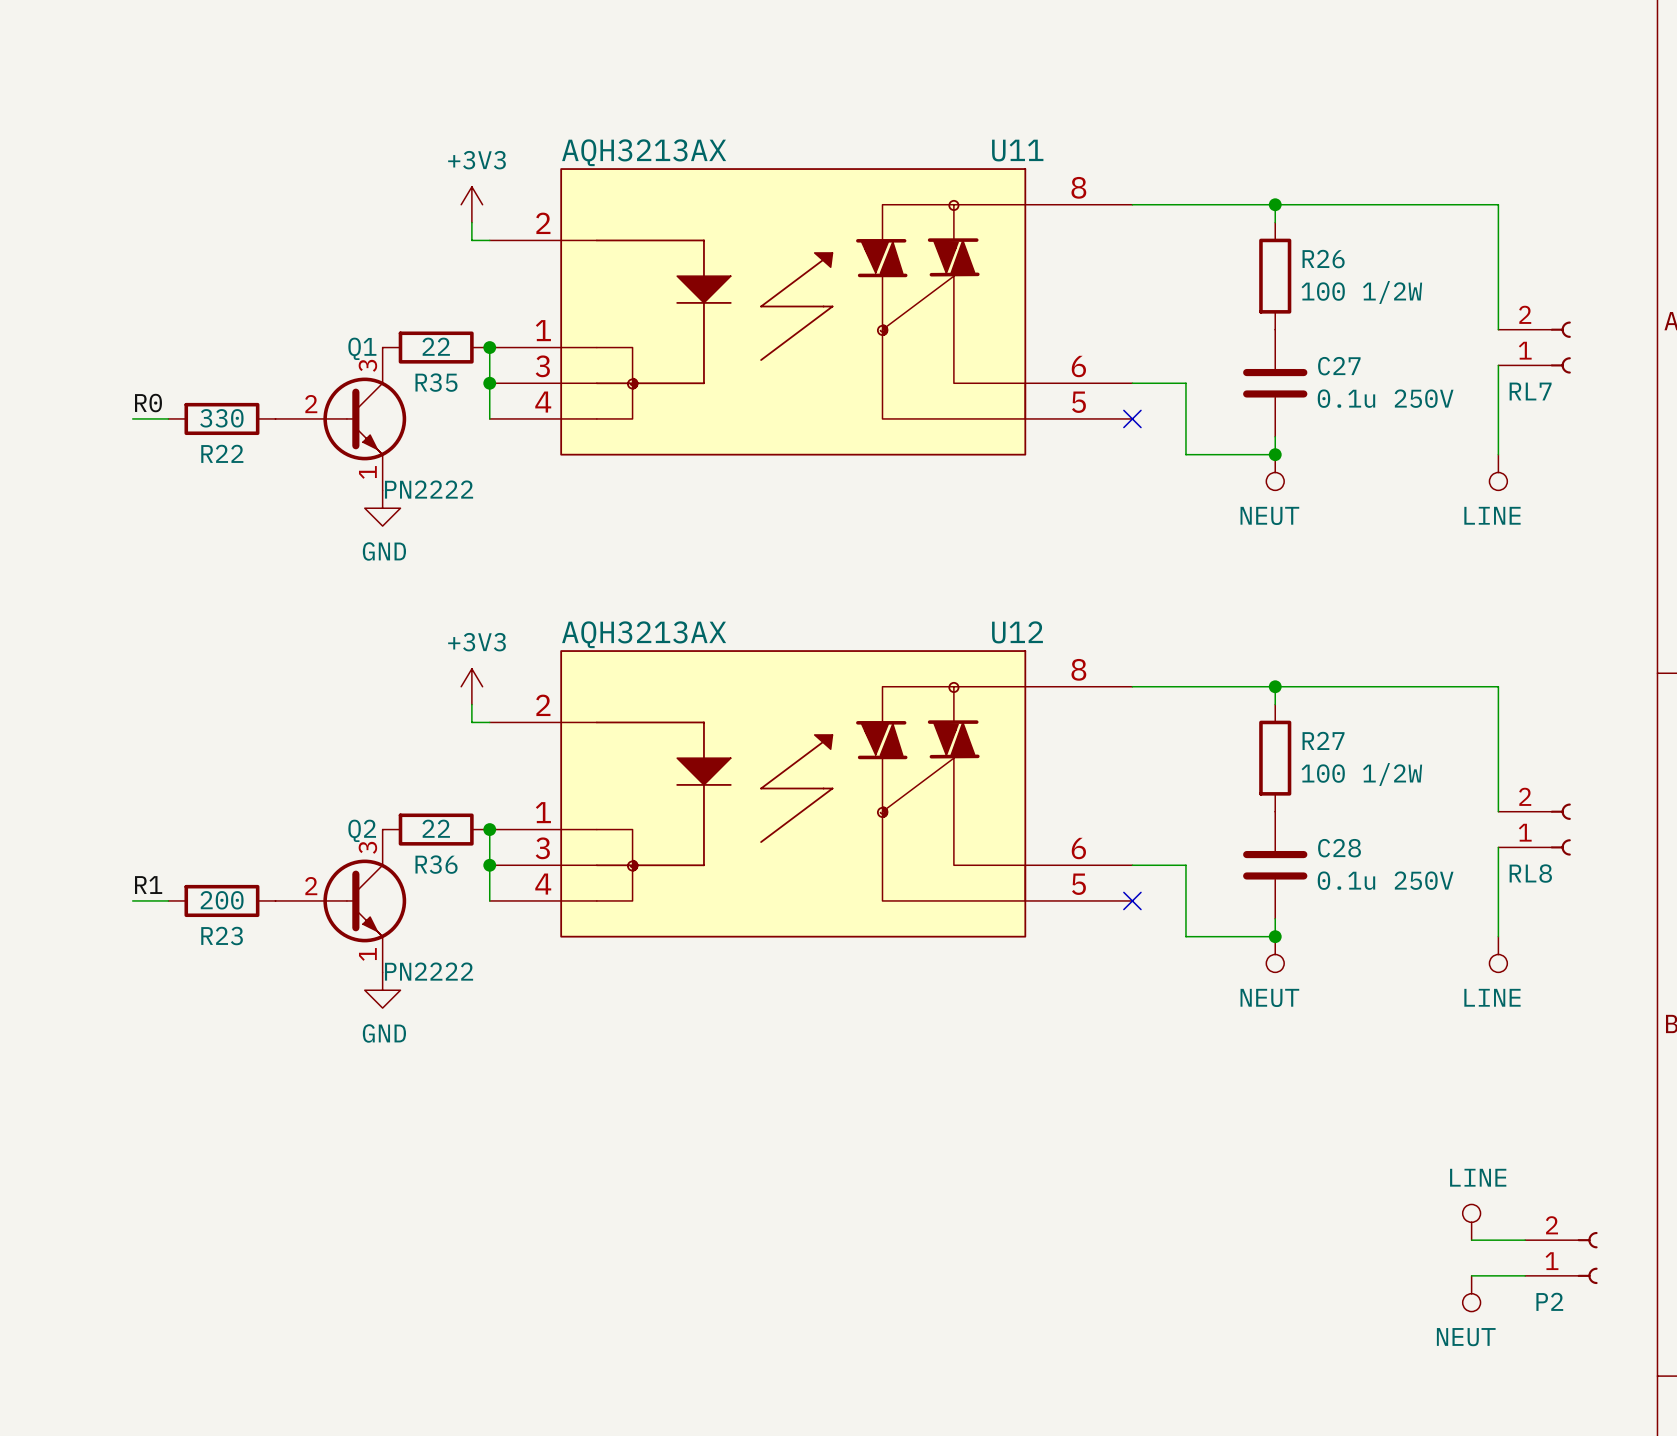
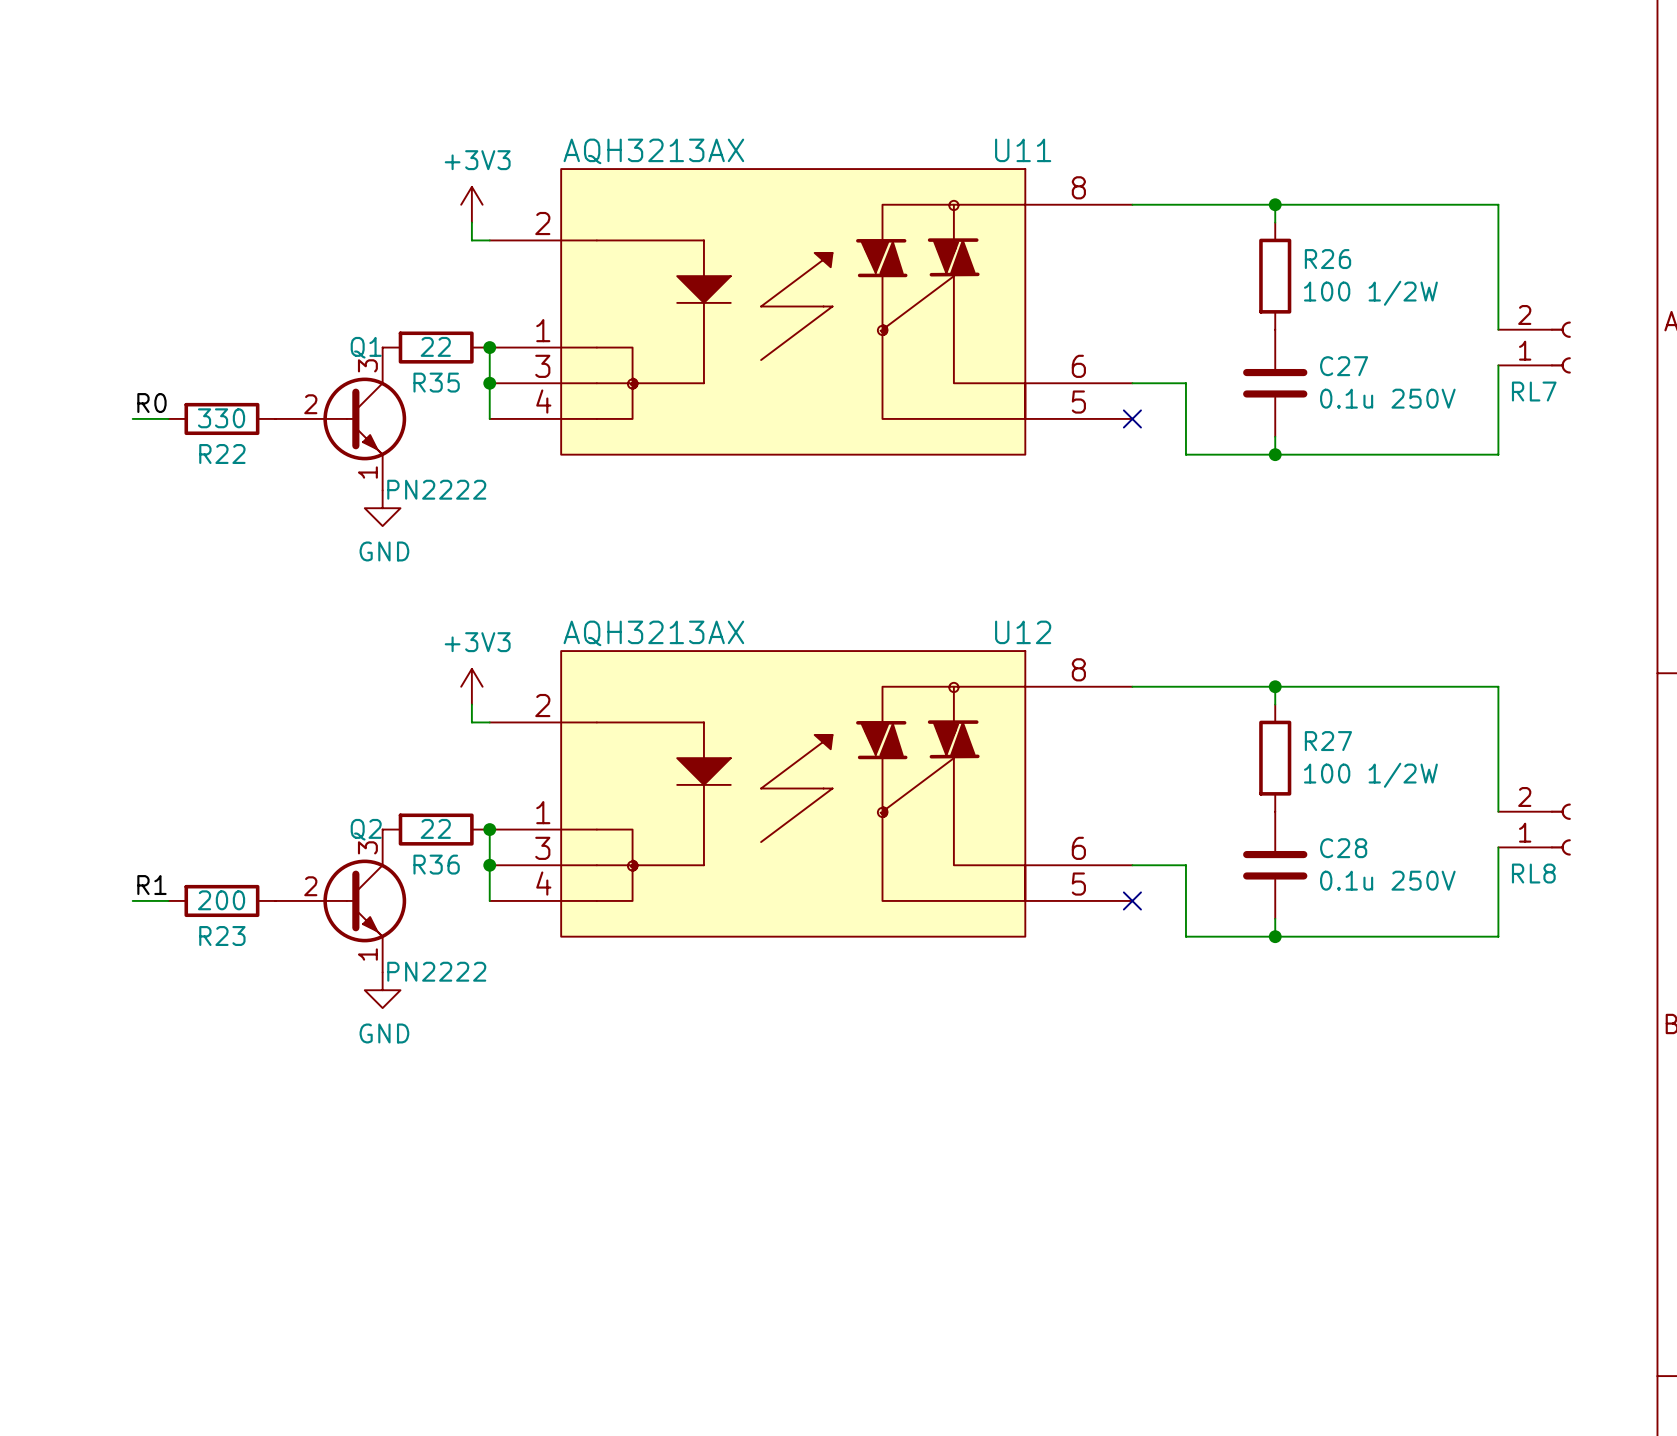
wire: none -> (1275, 454) (1498, 454)
power symbol: NEUT (1275, 472) -> none
power symbol: LINE (1498, 472) -> none
wire: none -> (1275, 936) (1498, 936)
power symbol: NEUT (1275, 954) -> none
power symbol: LINE (1498, 954) -> none
power symbol: LINE (1471, 1222) -> none
wire: (1471, 1240) (1525, 1240) -> none
P2: (1561, 1258) -> none
wire: (1471, 1275) (1525, 1275) -> none
power symbol: NEUT (1471, 1293) -> none

